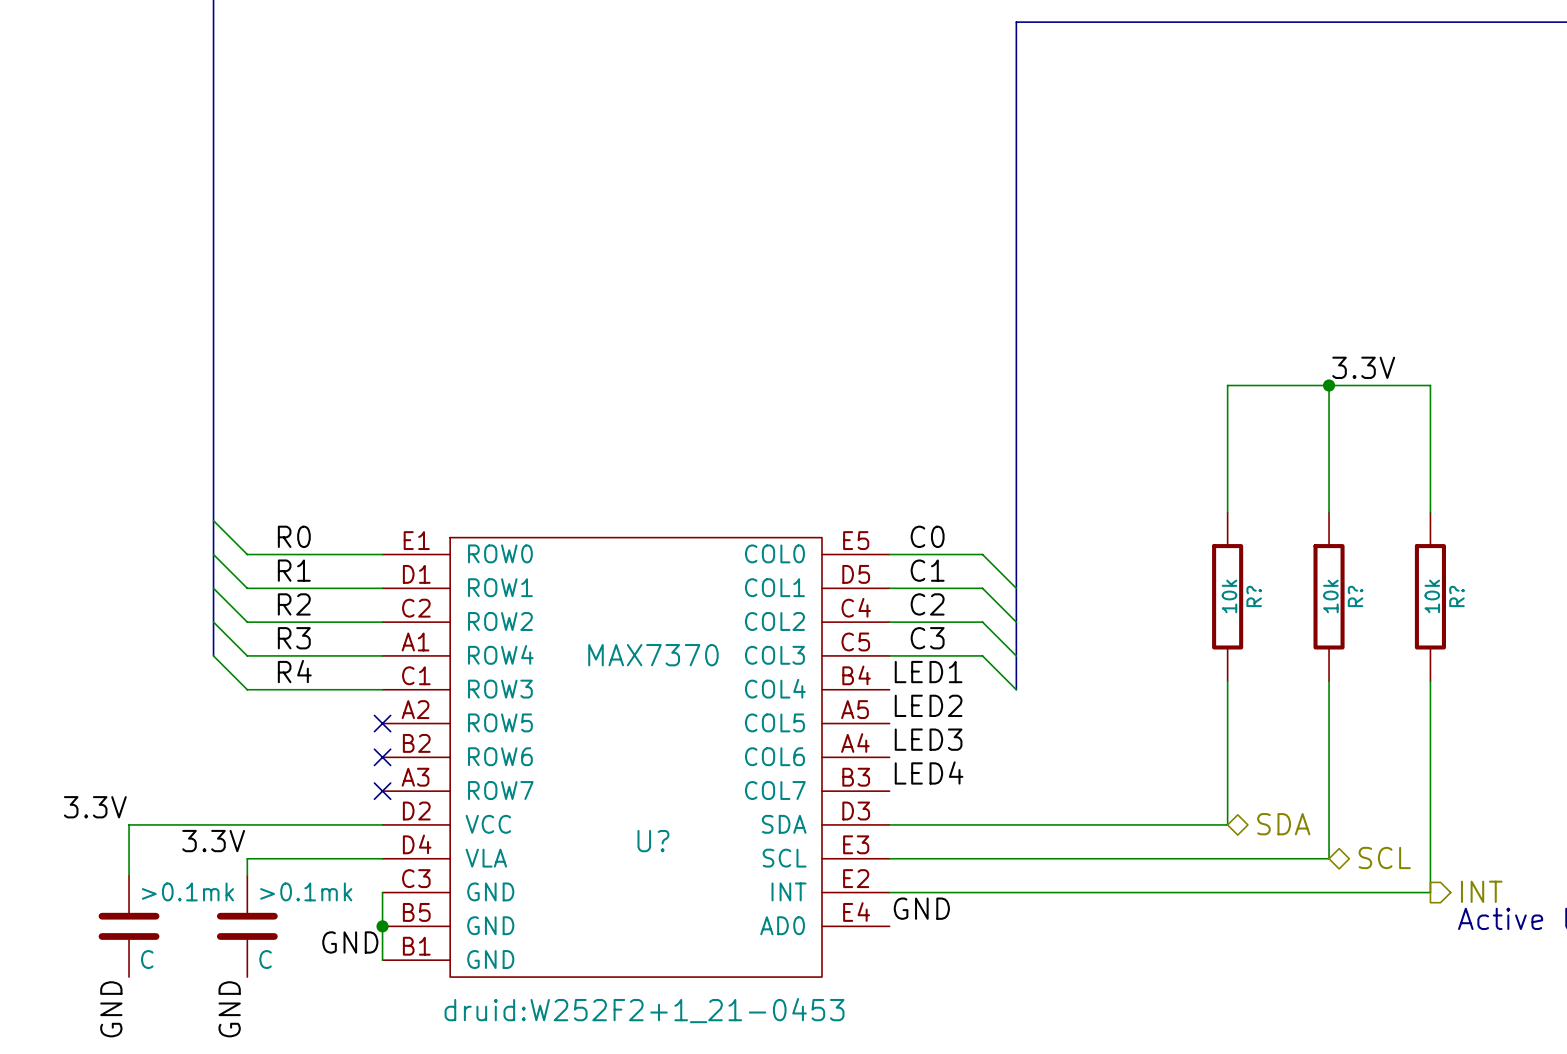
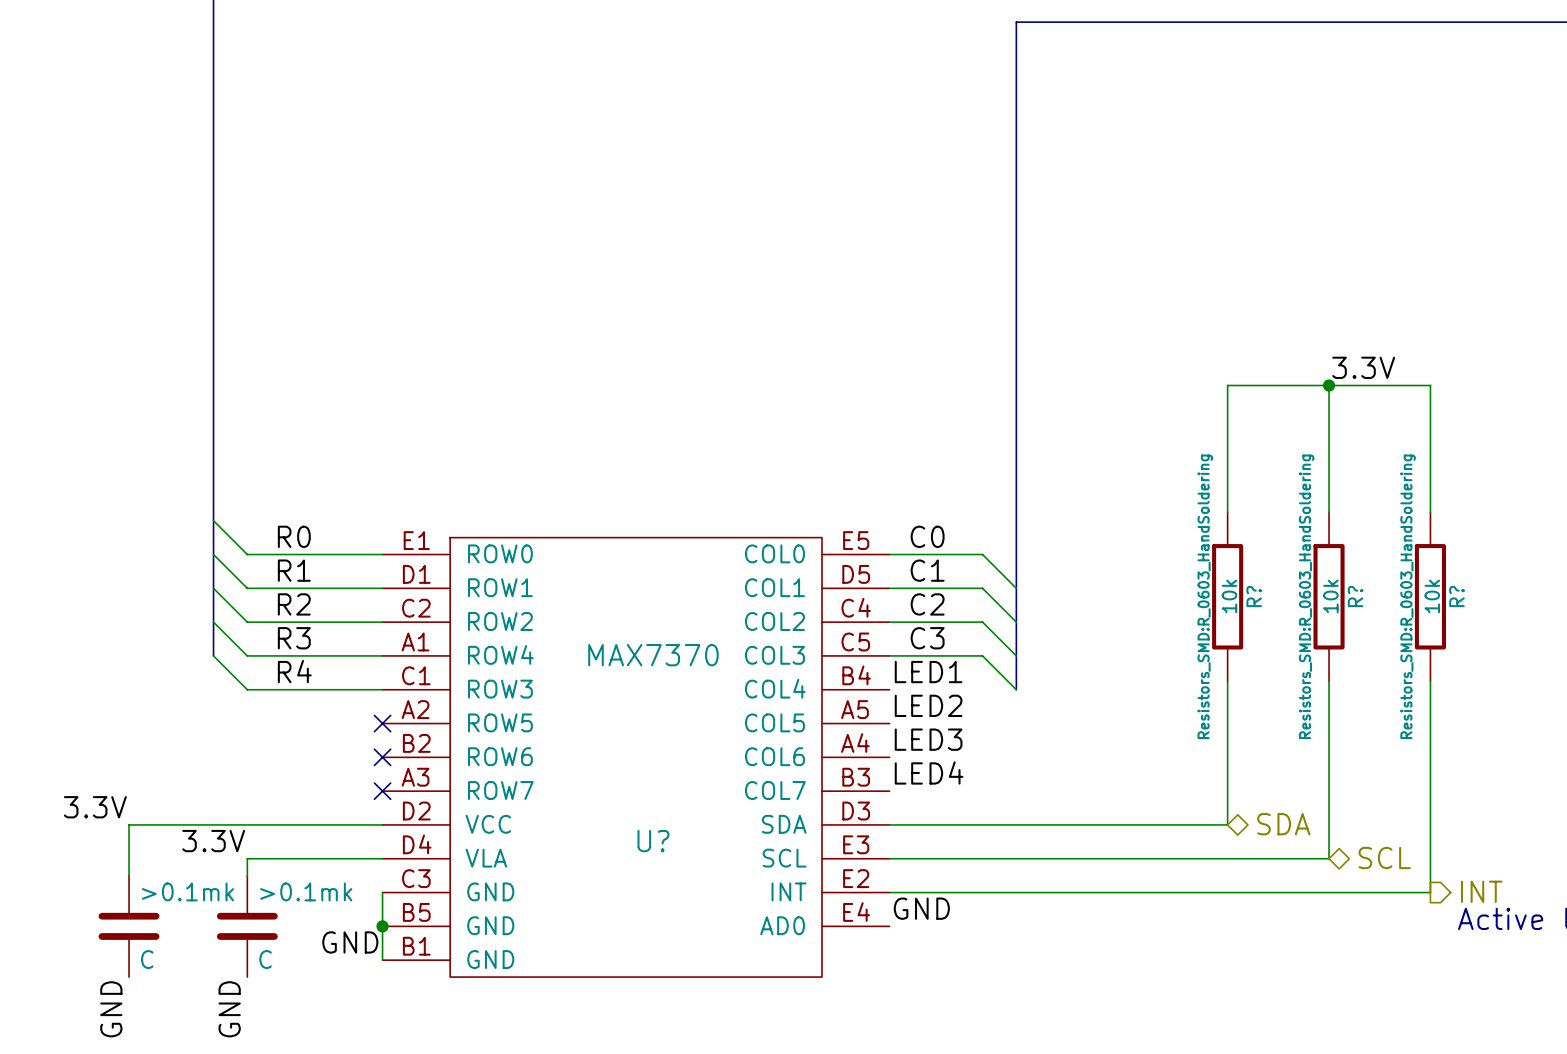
R? text: none -> Resistors_SMD:R_0603_HandSoldering (1205, 596)
R? text: none -> Resistors_SMD:R_0603_HandSoldering (1306, 596)
R? text: none -> Resistors_SMD:R_0603_HandSoldering (1408, 596)
U? text: druid:W252F2+1_21-0453 (644, 1010) -> none

